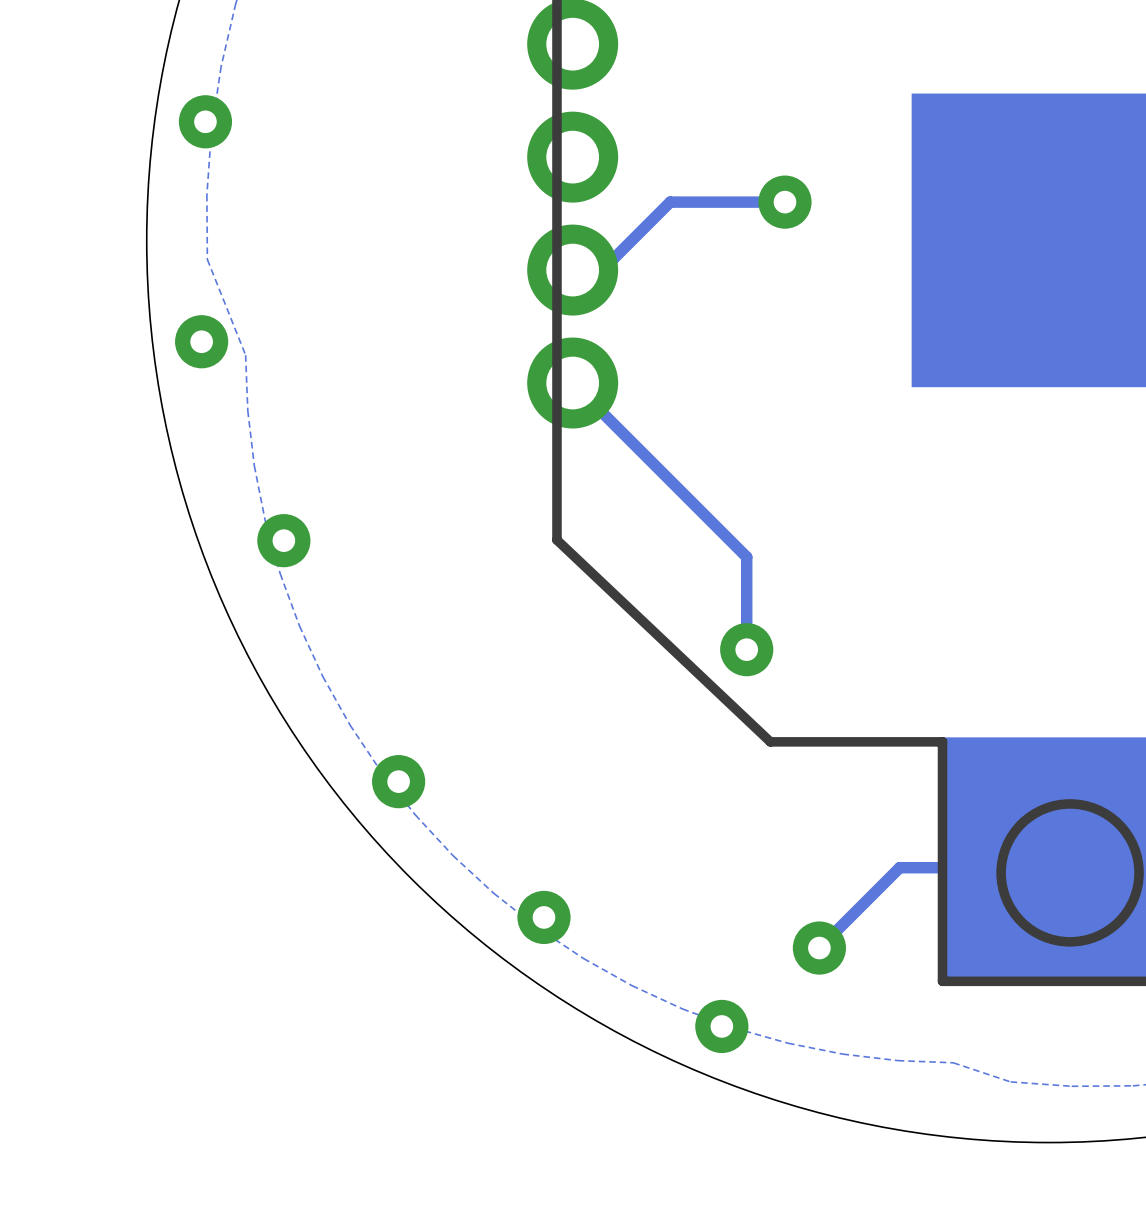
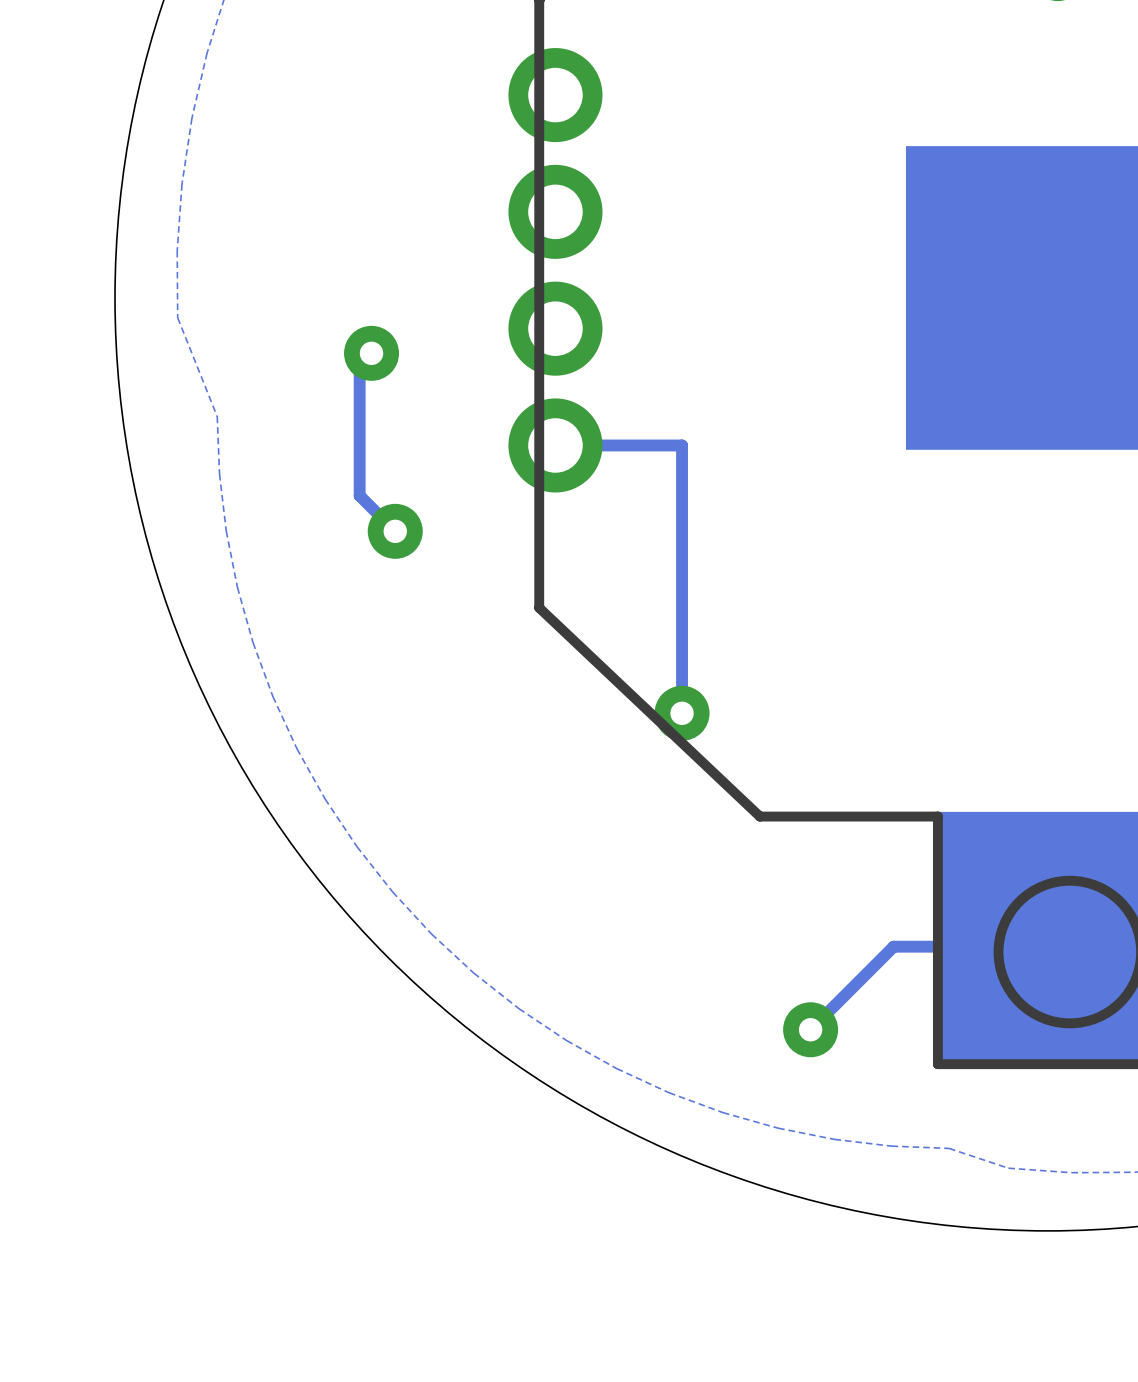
via: (205, 121) -> none
track: (784, 202) (670, 202) (612, 259) (578, 259) (572, 270) -> none
via: (784, 202) -> none
track: none -> (371, 353) (359, 365) (359, 495) (395, 531)
via: none -> (371, 353)
via: (201, 341) -> none
track: (572, 383) (746, 557) (746, 649) -> (555, 445) (682, 445) (682, 713)
via: none -> (395, 531)
via: (283, 540) -> none
via position: (746, 649) -> (682, 713)
via: (398, 781) -> none
via: (543, 917) -> none
via: (721, 1026) -> none

